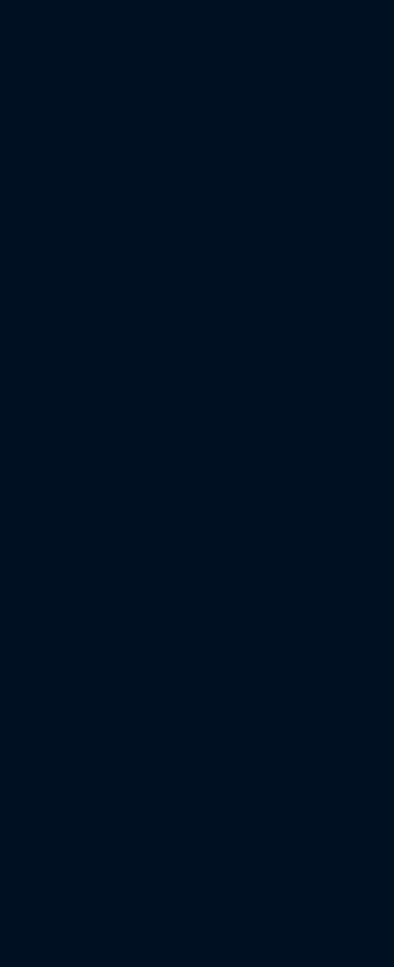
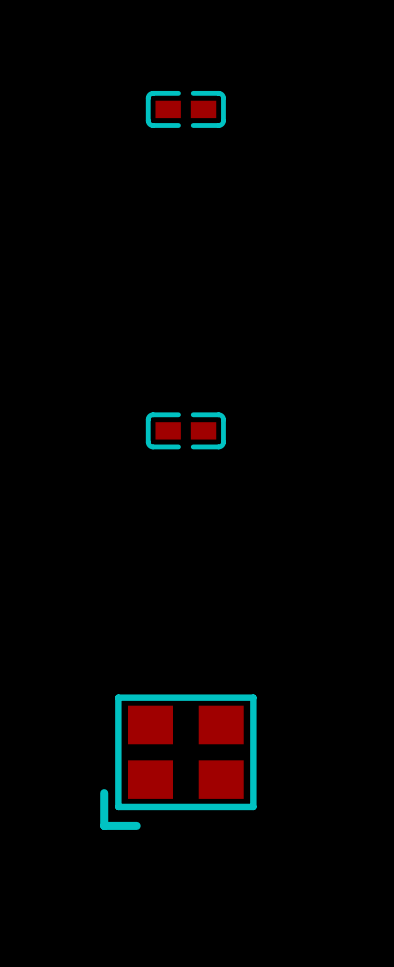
part: none -> (185, 109)
part: none -> (185, 430)
part: none -> (178, 762)

